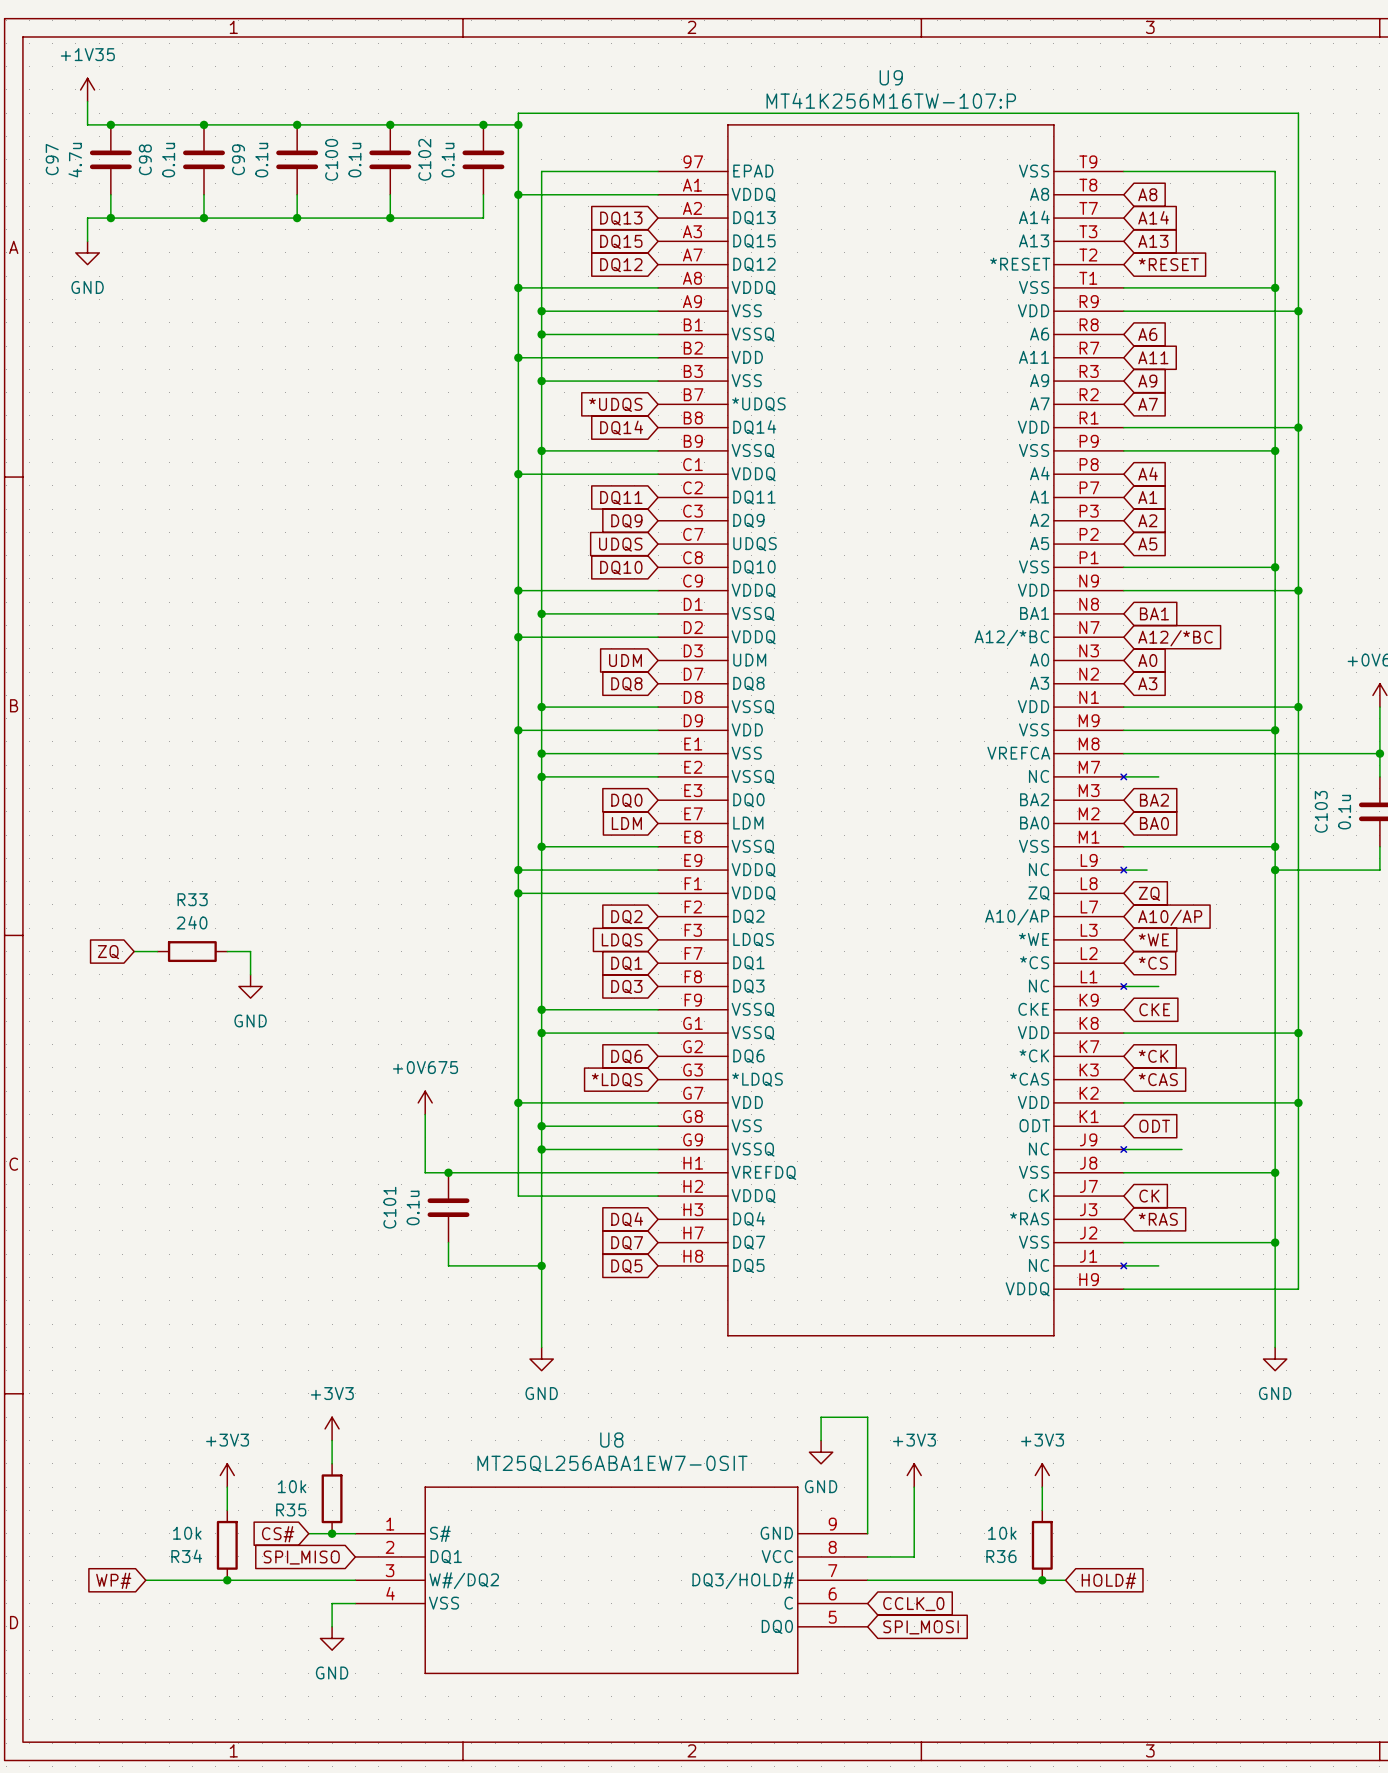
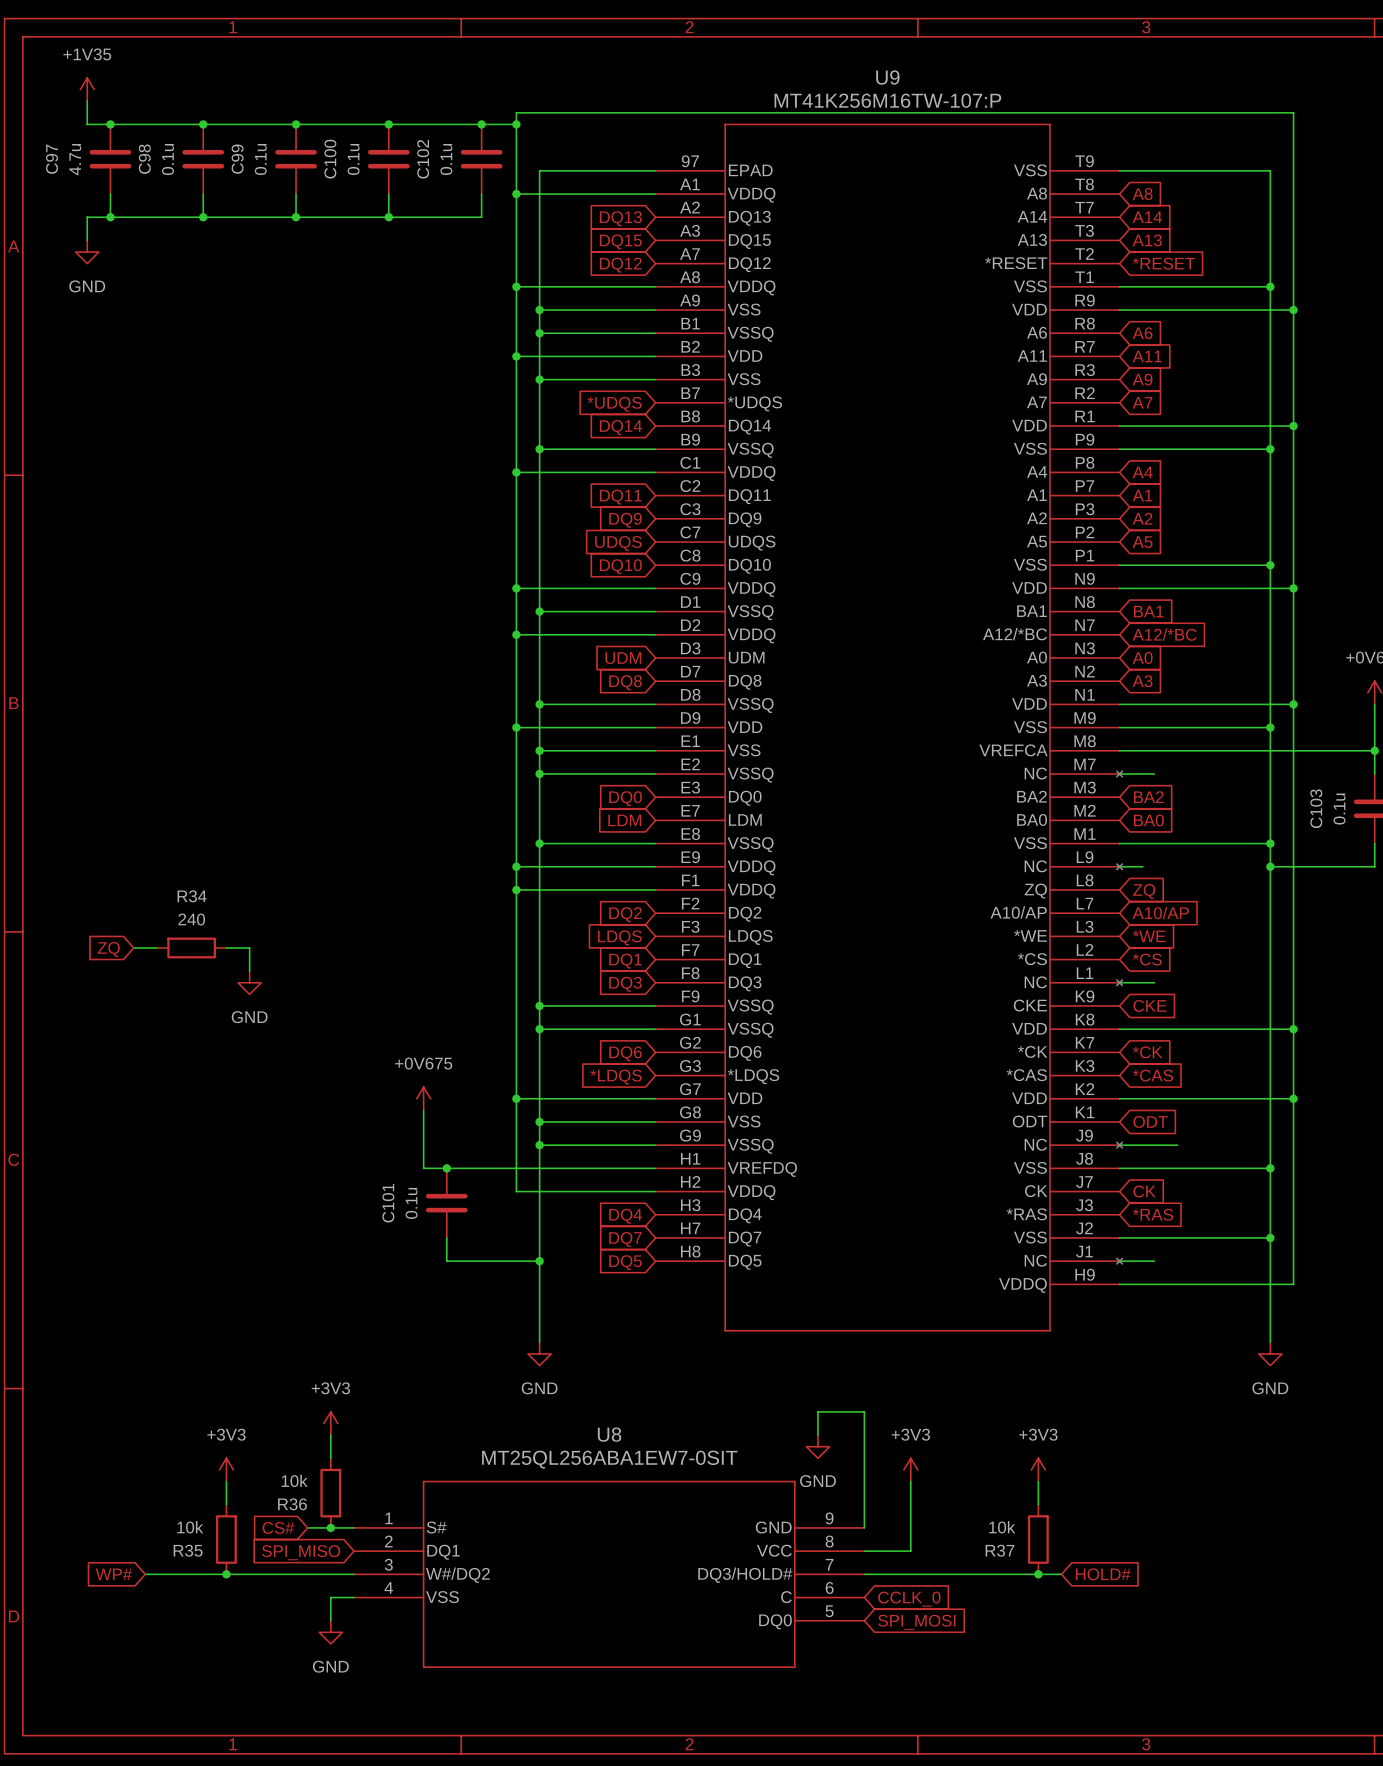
R33 name: R33 (192, 899) -> R34 (192, 896)
R35 name: R35 (291, 1509) -> R36 (292, 1504)
R34 name: R34 (186, 1556) -> R35 (188, 1550)
R36 name: R36 (1001, 1556) -> R37 (999, 1550)

